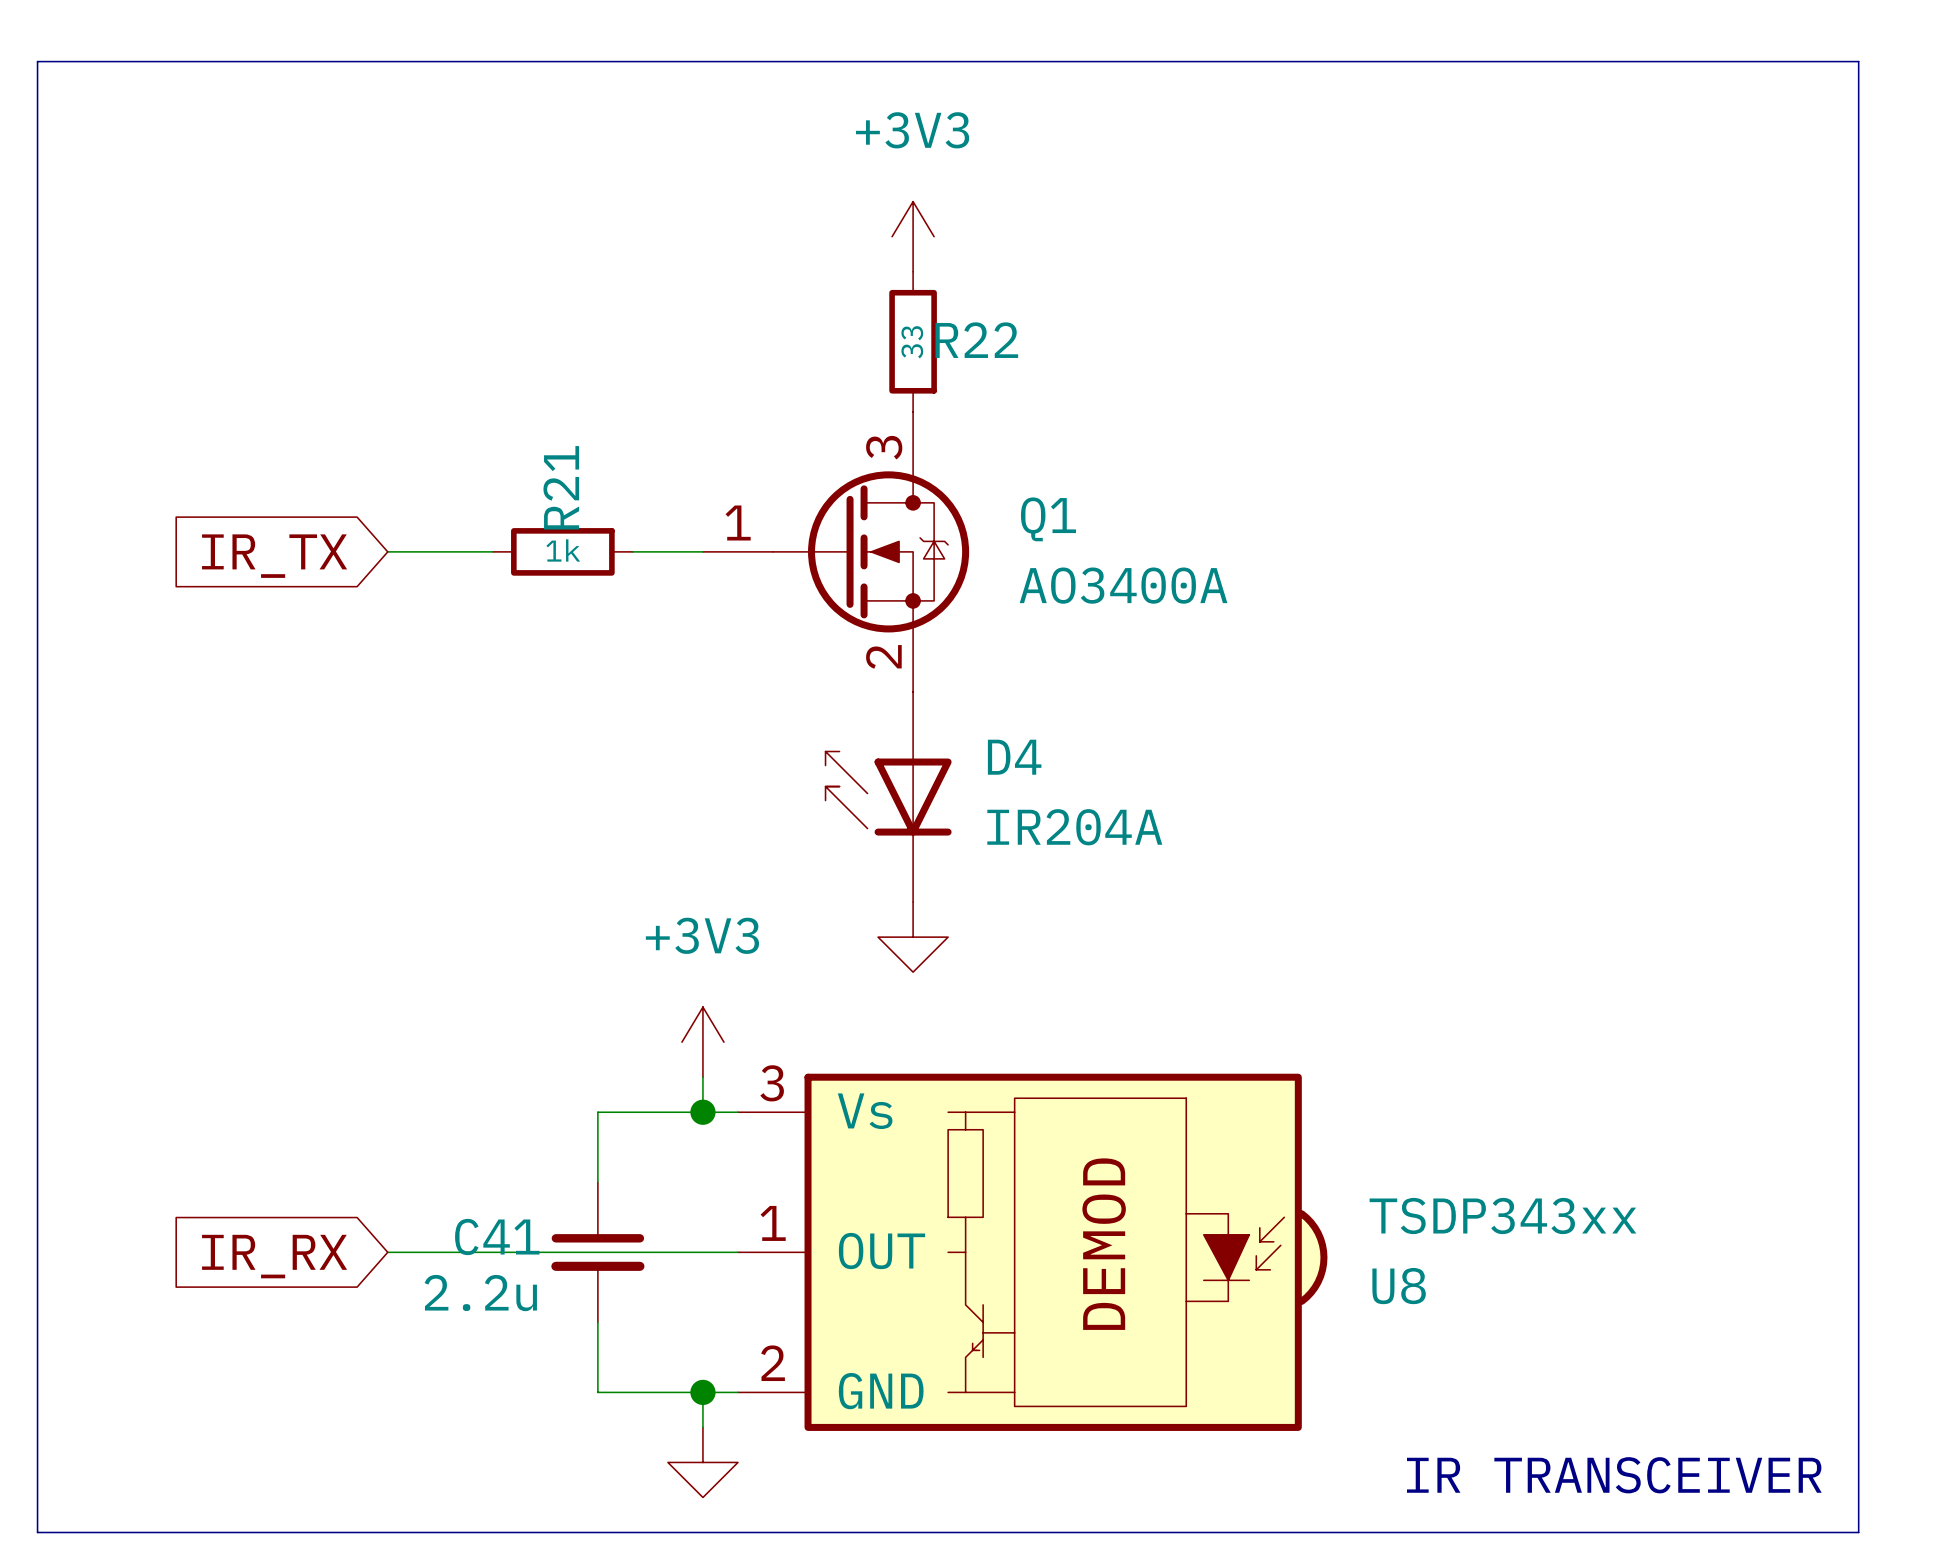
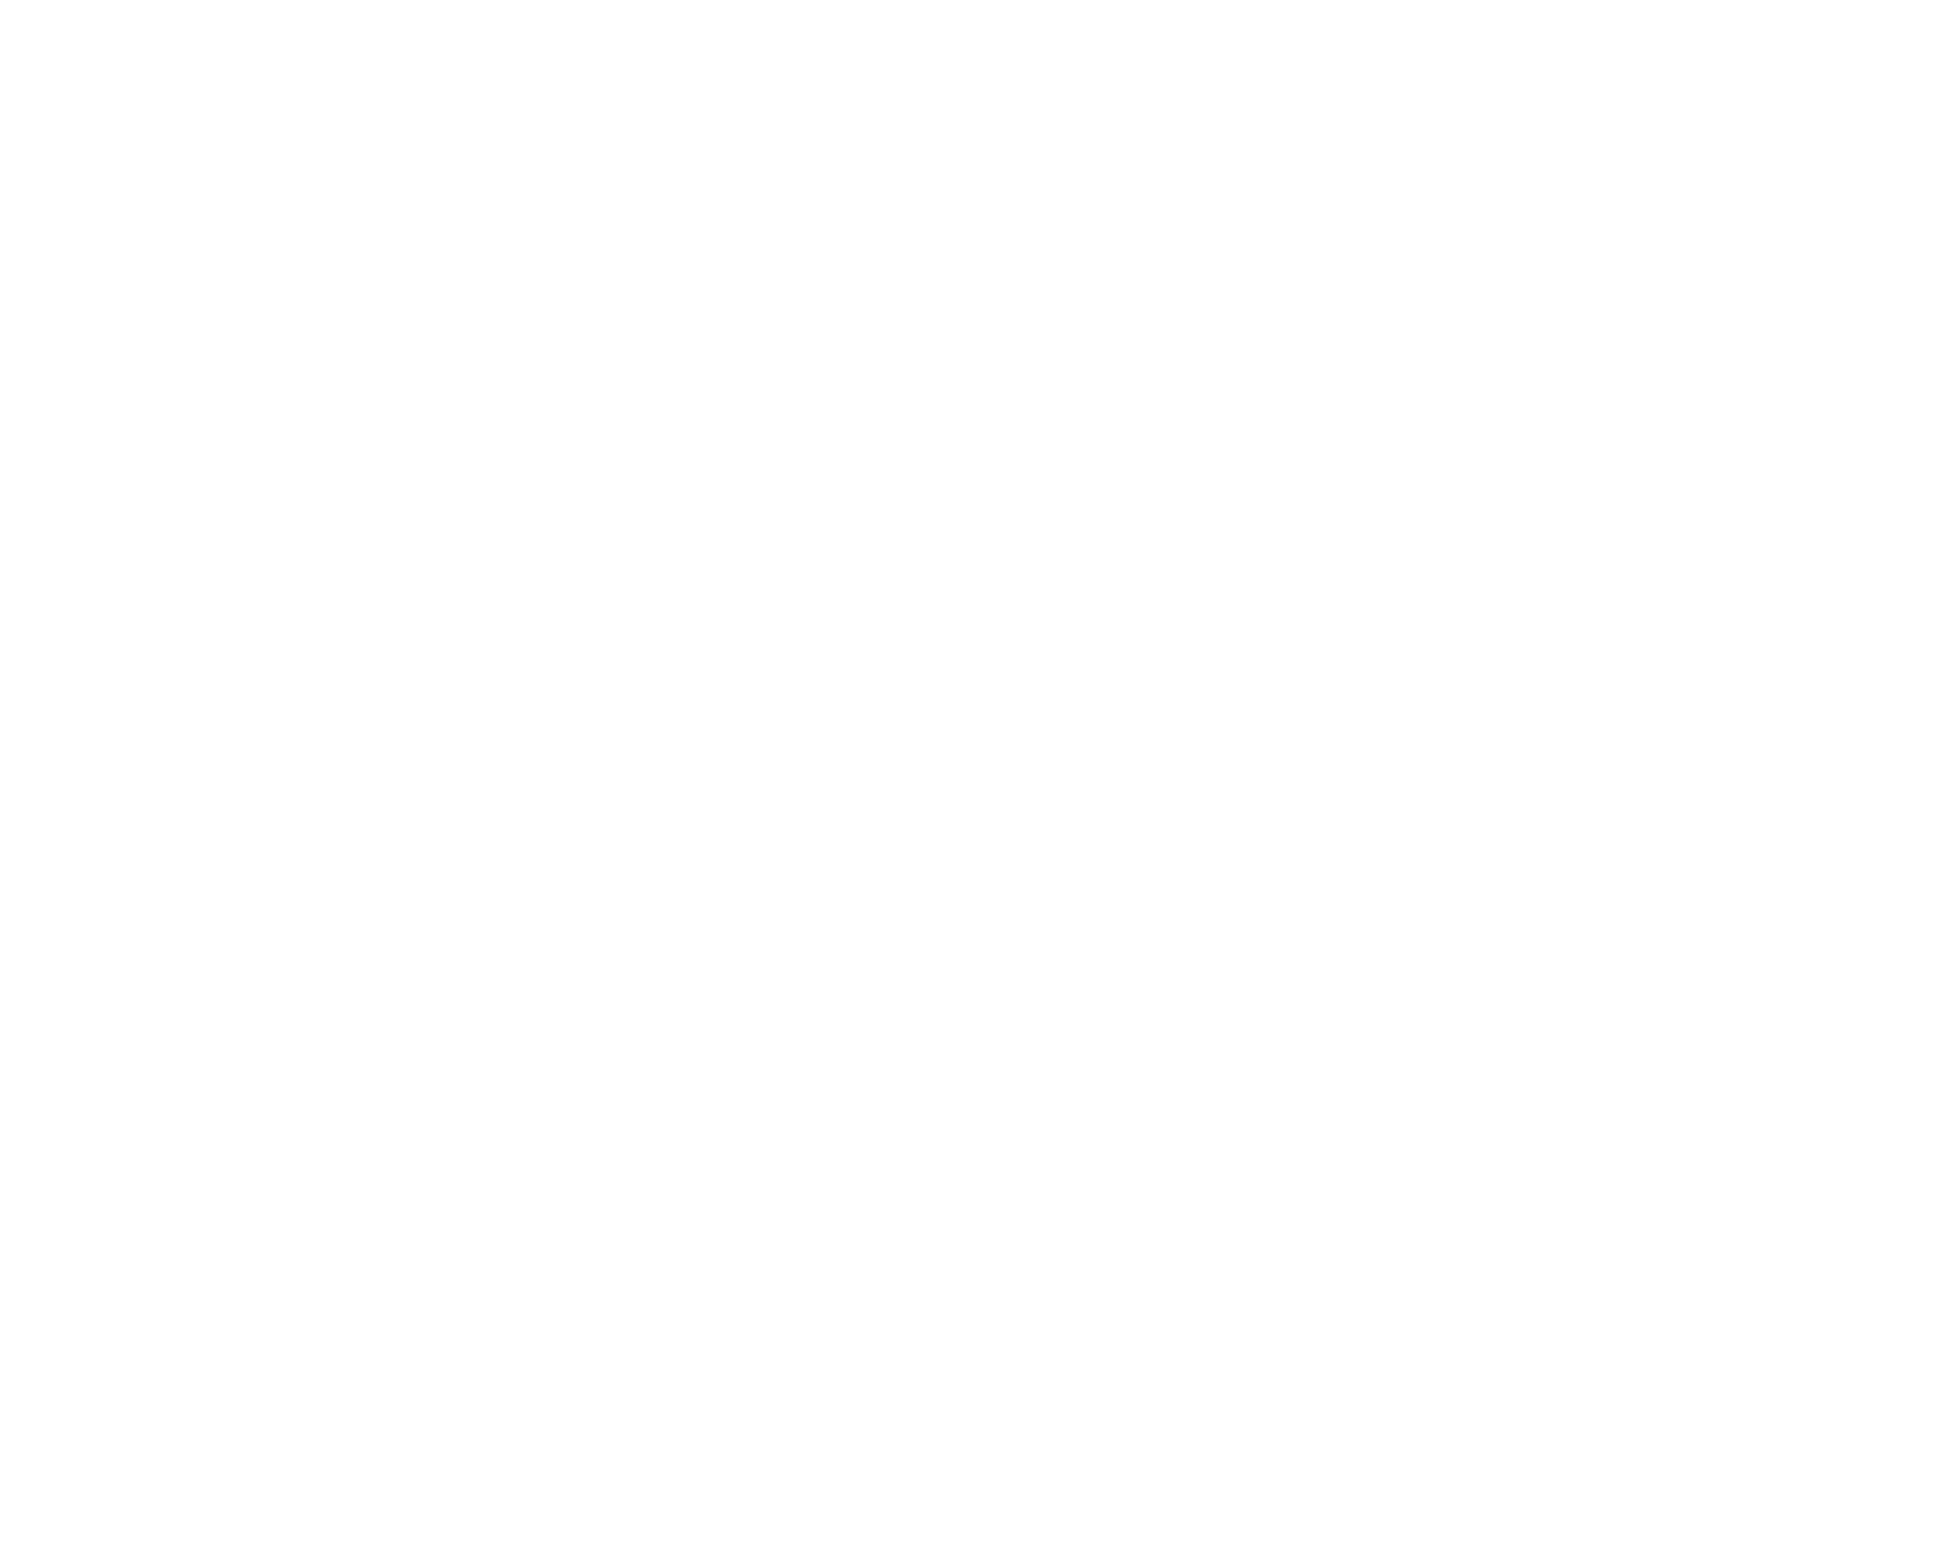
line: (37, 61) (1858, 61) (1858, 1532) (37, 1532) (37, 61) -> none
power symbol: +3V3 (913, 236) -> none
R22: 33 (913, 341) -> none
wire: (387, 551) (492, 551) -> none
R21: 1k (562, 551) -> none
wire: (632, 551) (702, 551) -> none
Q1: AO3400A (836, 551) -> none
global label: IR_TX (274, 556) -> none
D4: IR204A (888, 797) -> none
power symbol: (913, 937) -> none
power symbol: +3V3 (702, 1042) -> none
wire: (702, 1077) (702, 1112) -> none
junction: (702, 1112) -> none
wire: (737, 1112) (597, 1112) (597, 1182) -> none
wire: (387, 1252) (737, 1252) -> none
C41: 2.2u (597, 1252) -> none
U8: TSDP343xx (1032, 1252) -> none
global label: IR_RX (274, 1256) -> none
wire: (597, 1322) (597, 1392) (737, 1392) -> none
wire: (702, 1392) (702, 1427) -> none
junction: (702, 1392) -> none
power symbol: (702, 1462) -> none
text: IR TRANSCEIVER (1614, 1475) -> none

